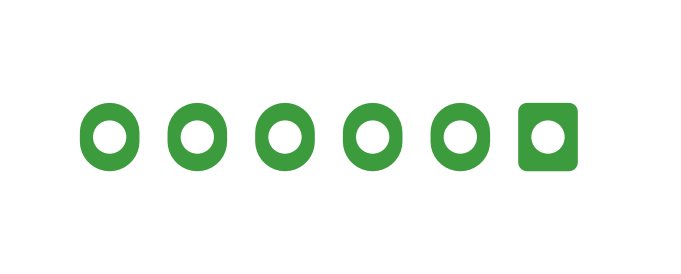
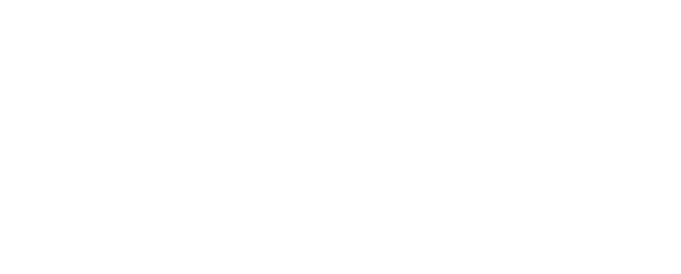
part: (328, 137) -> none

